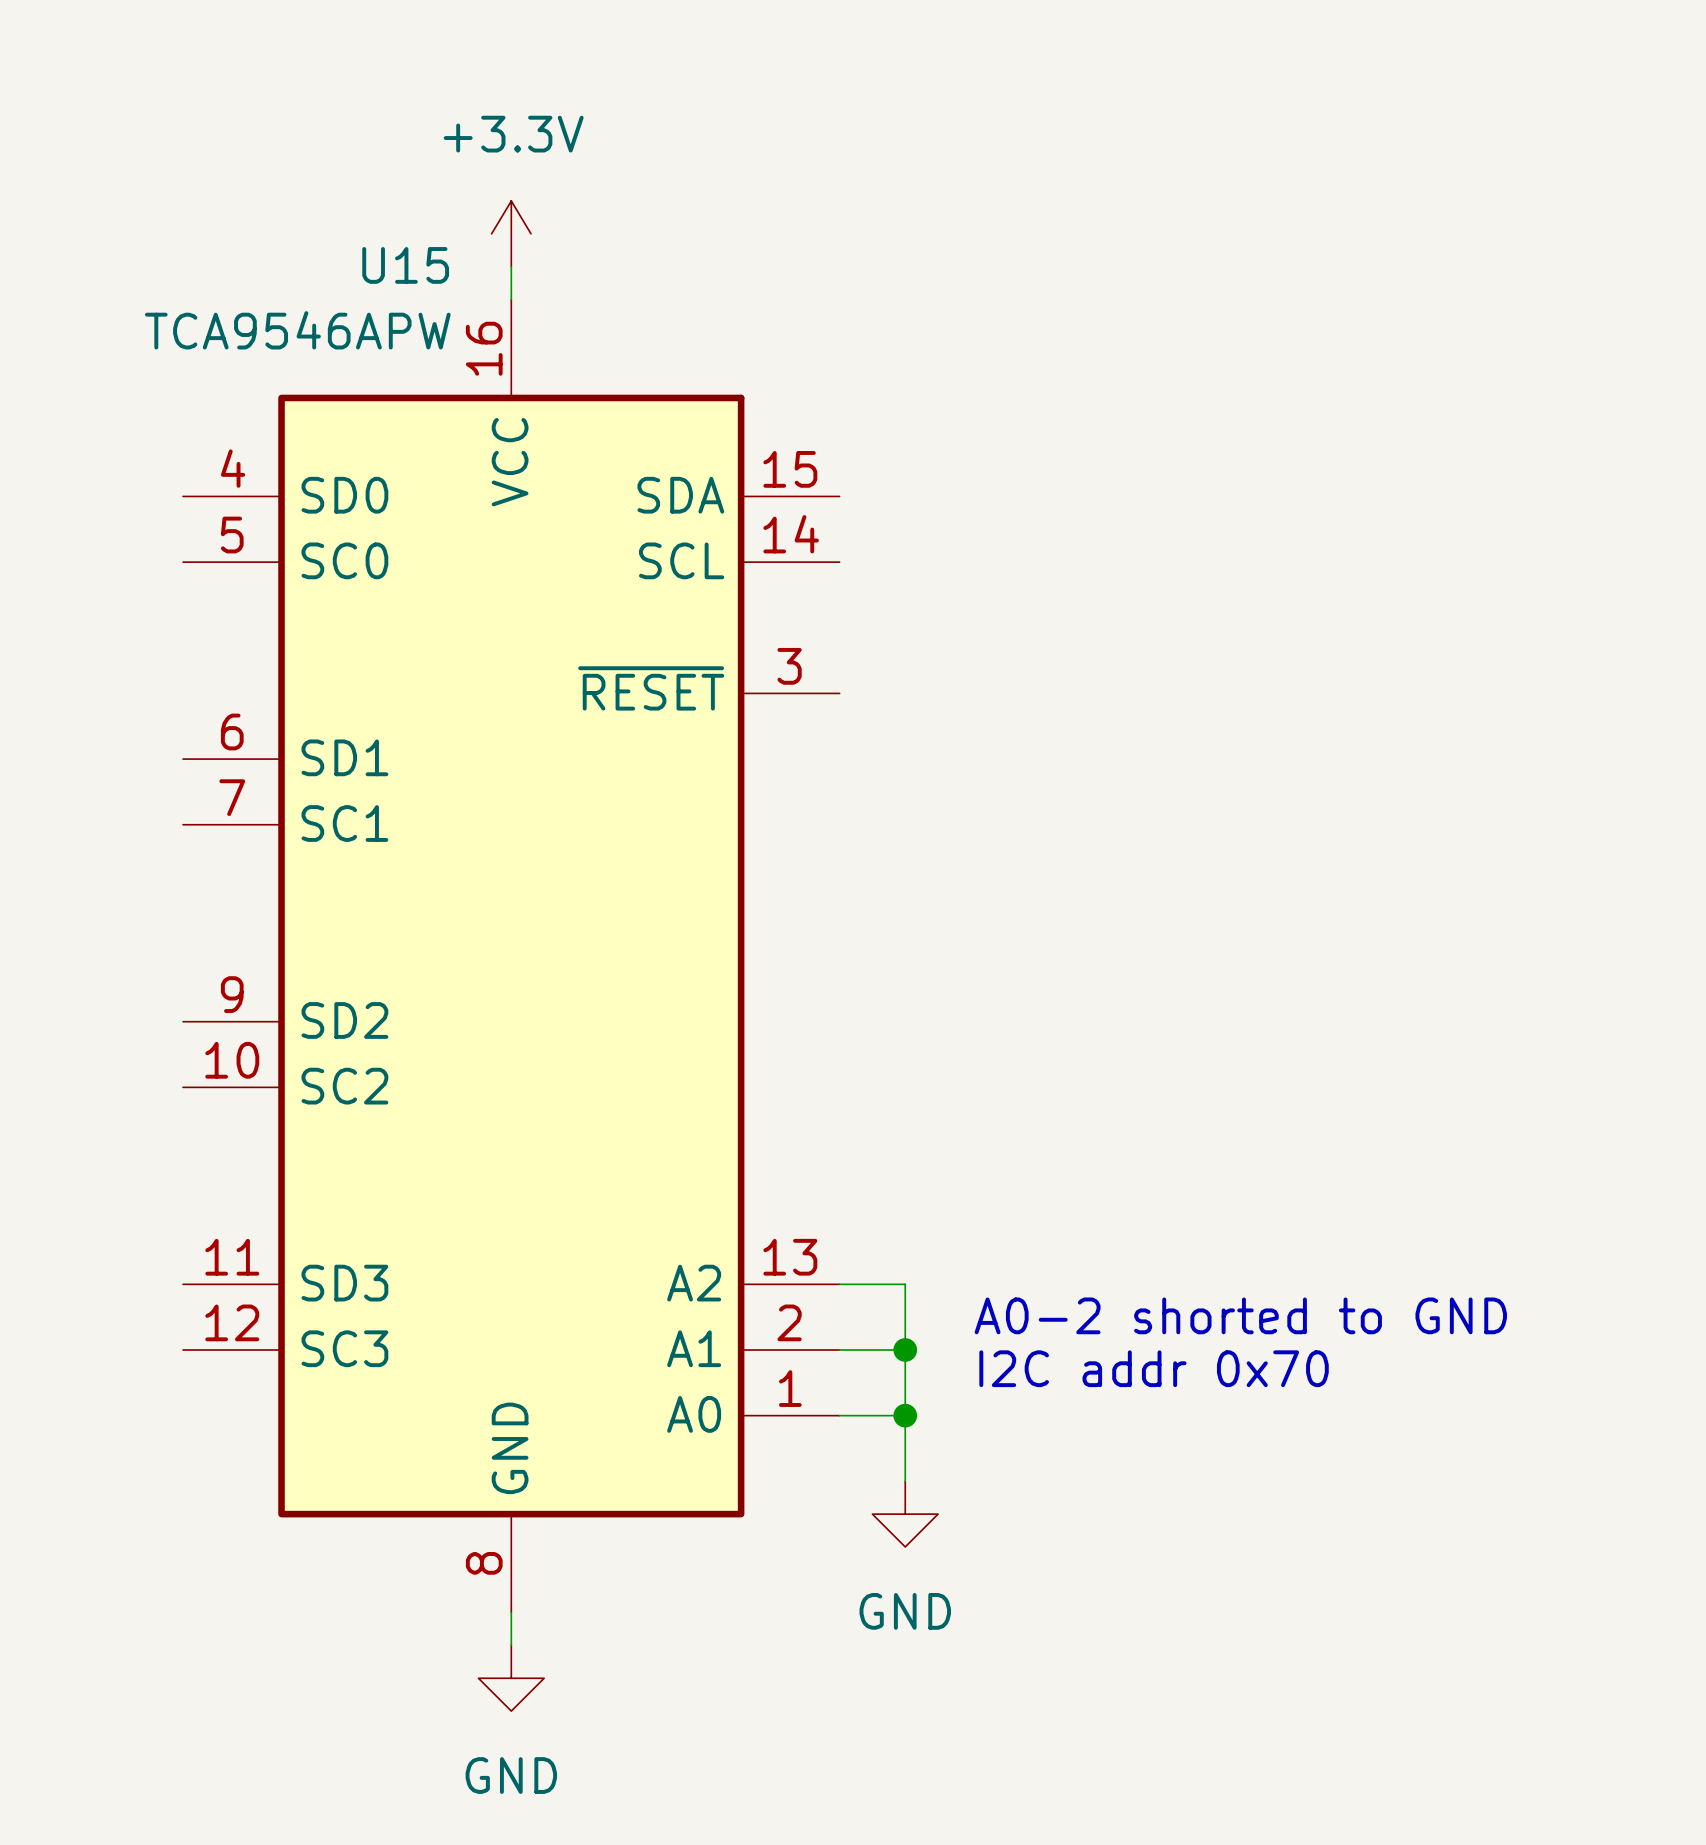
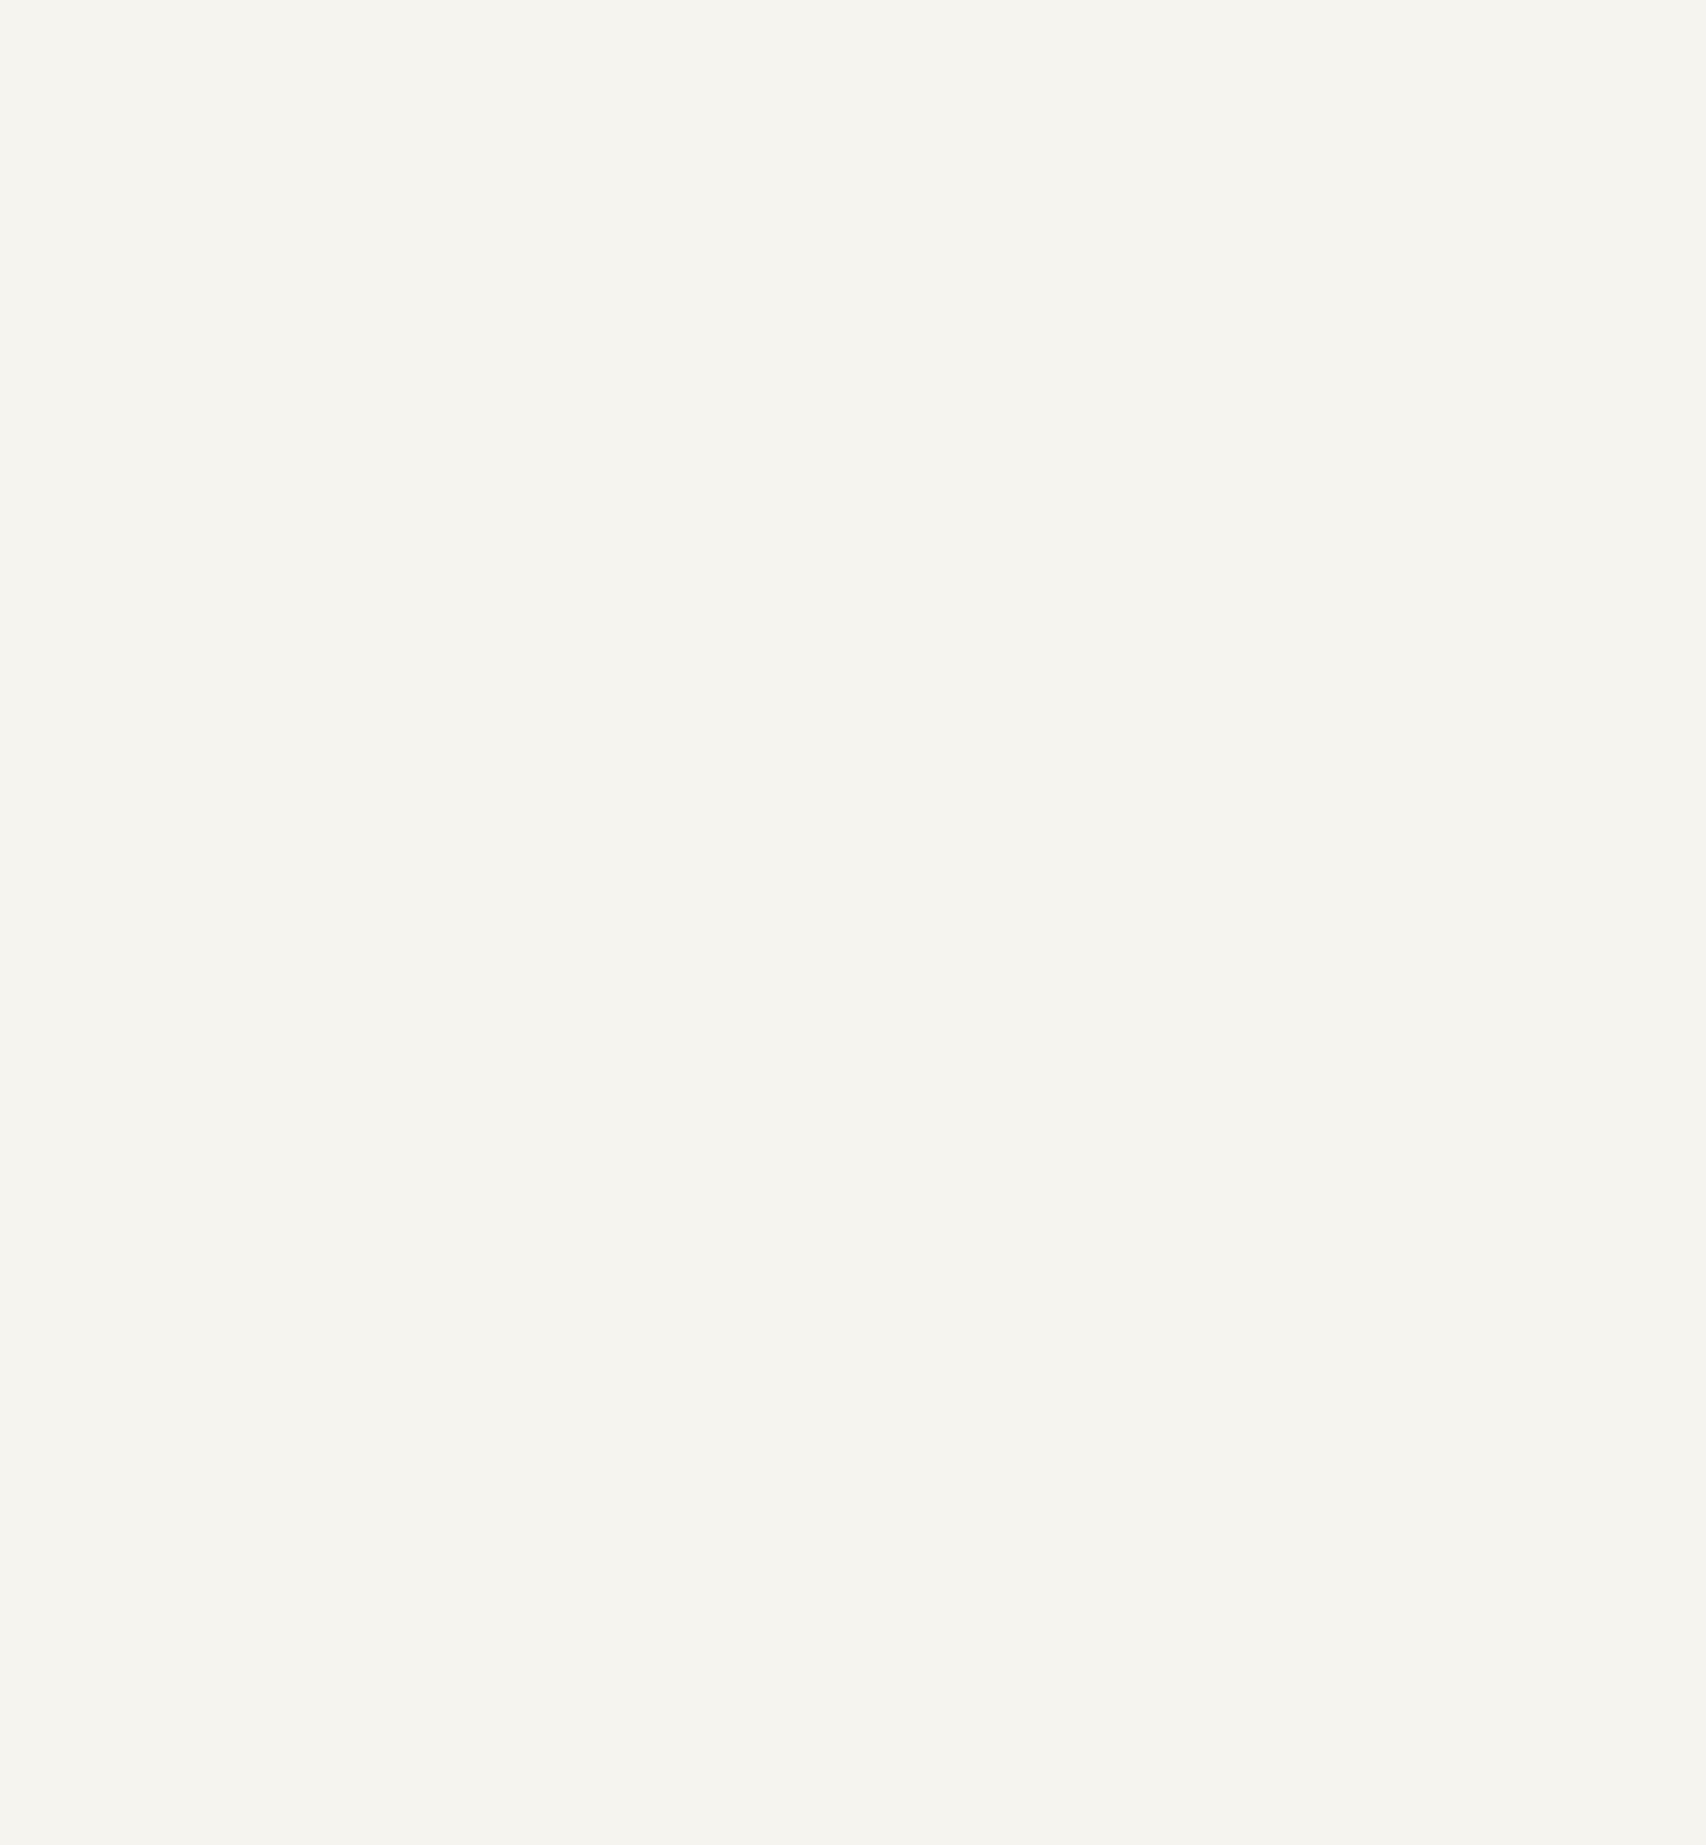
power symbol: +3.3V (511, 233) -> none
wire: (511, 266) (511, 299) -> none
U15: TCA9546APW (511, 956) -> none
wire: (839, 1284) (905, 1284) (905, 1481) -> none
text: A0-2 shorted to GND (1240, 1315) -> none
wire: (839, 1349) (905, 1349) -> none
junction: (905, 1349) -> none
text: I2C addr 0x70 (1154, 1368) -> none
wire: (839, 1415) (905, 1415) -> none
junction: (905, 1415) -> none
power symbol: GND (905, 1514) -> none
wire: (511, 1612) (511, 1645) -> none
power symbol: GND (511, 1678) -> none

